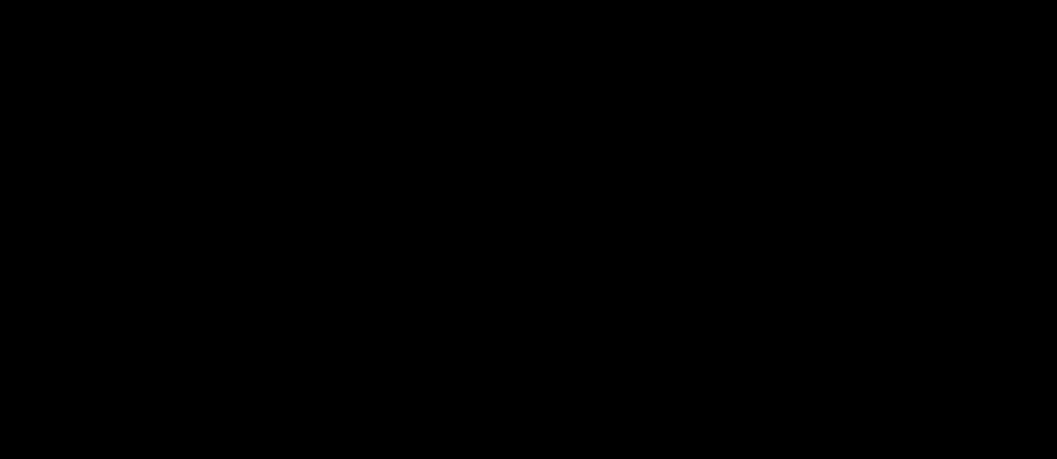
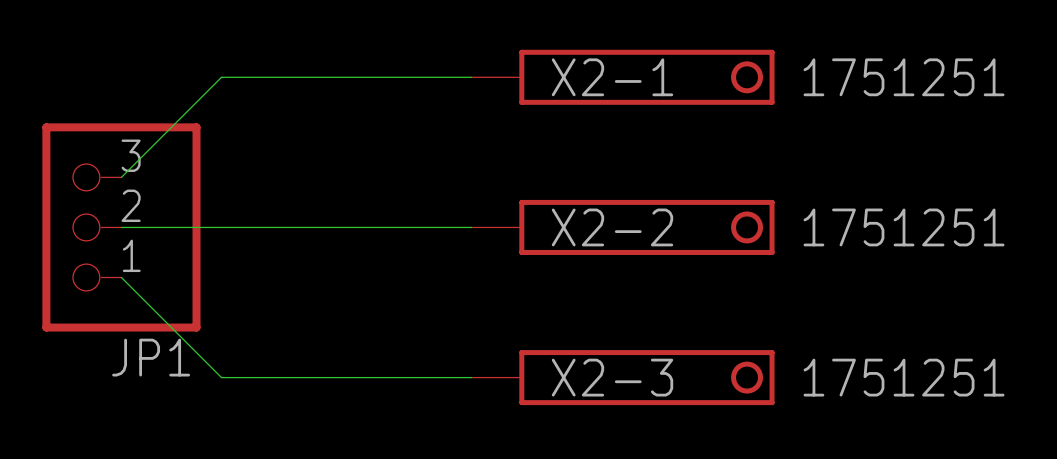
wire: none -> (471, 77) (221, 77) (121, 177)
X2-1: none -> 1751251 (623, 77)
wire: none -> (121, 227) (471, 227)
JP1: none -> (121, 227)
X2-2: none -> 1751251 (623, 227)
wire: none -> (121, 277) (221, 377) (471, 377)
X2-3: none -> 1751251 (623, 377)

